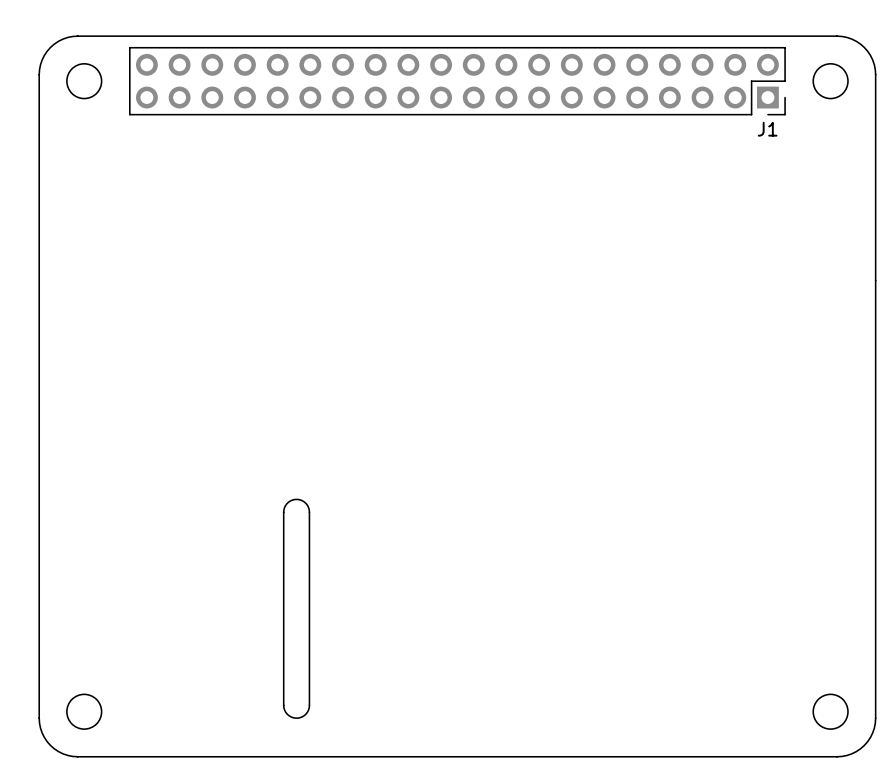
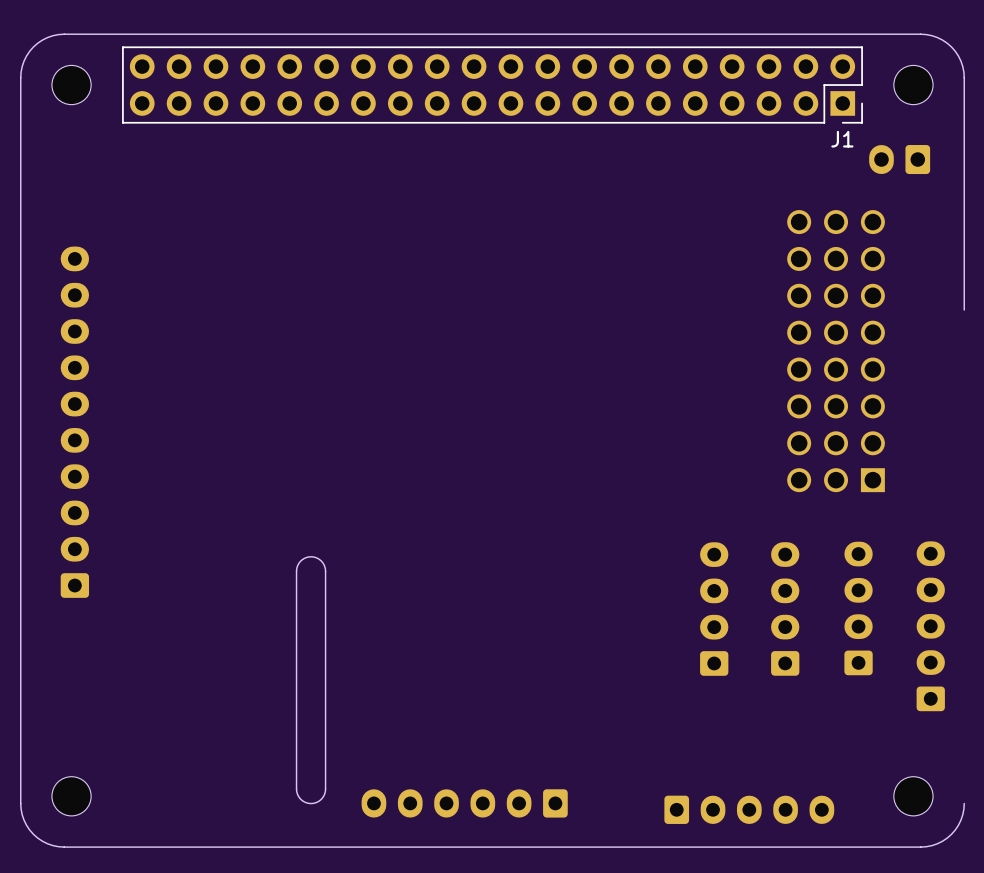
part: none -> (899, 159)
board edge: (875, 280) (875, 718) -> none
part: none -> (836, 351)
part: none -> (74, 422)
part: none -> (714, 609)
part: none -> (785, 608)
part: none -> (858, 608)
part: none -> (930, 626)
part: none -> (464, 803)
part: none -> (749, 809)

